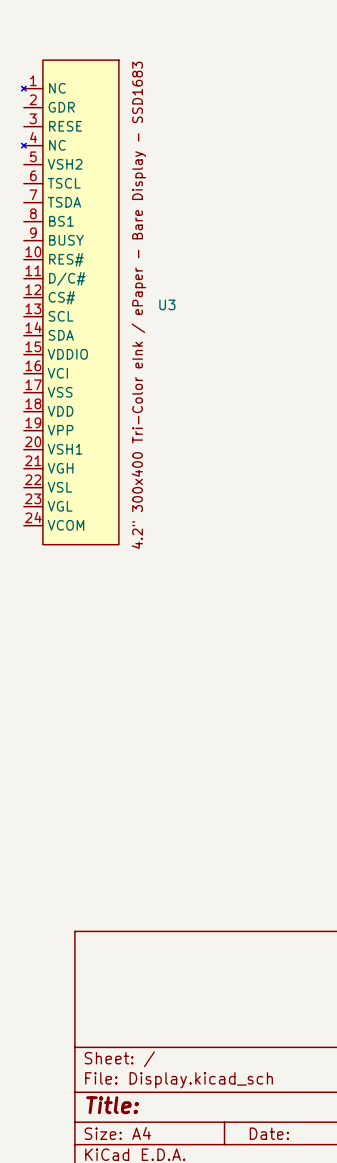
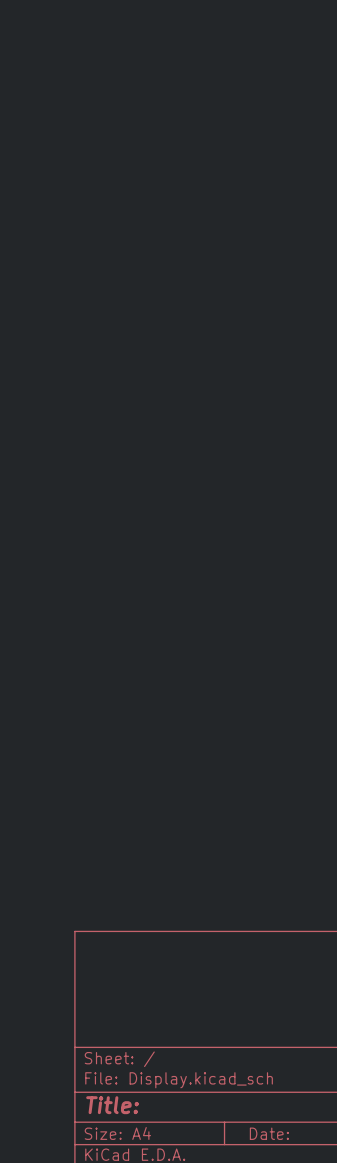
U3: (70, 302) -> none

